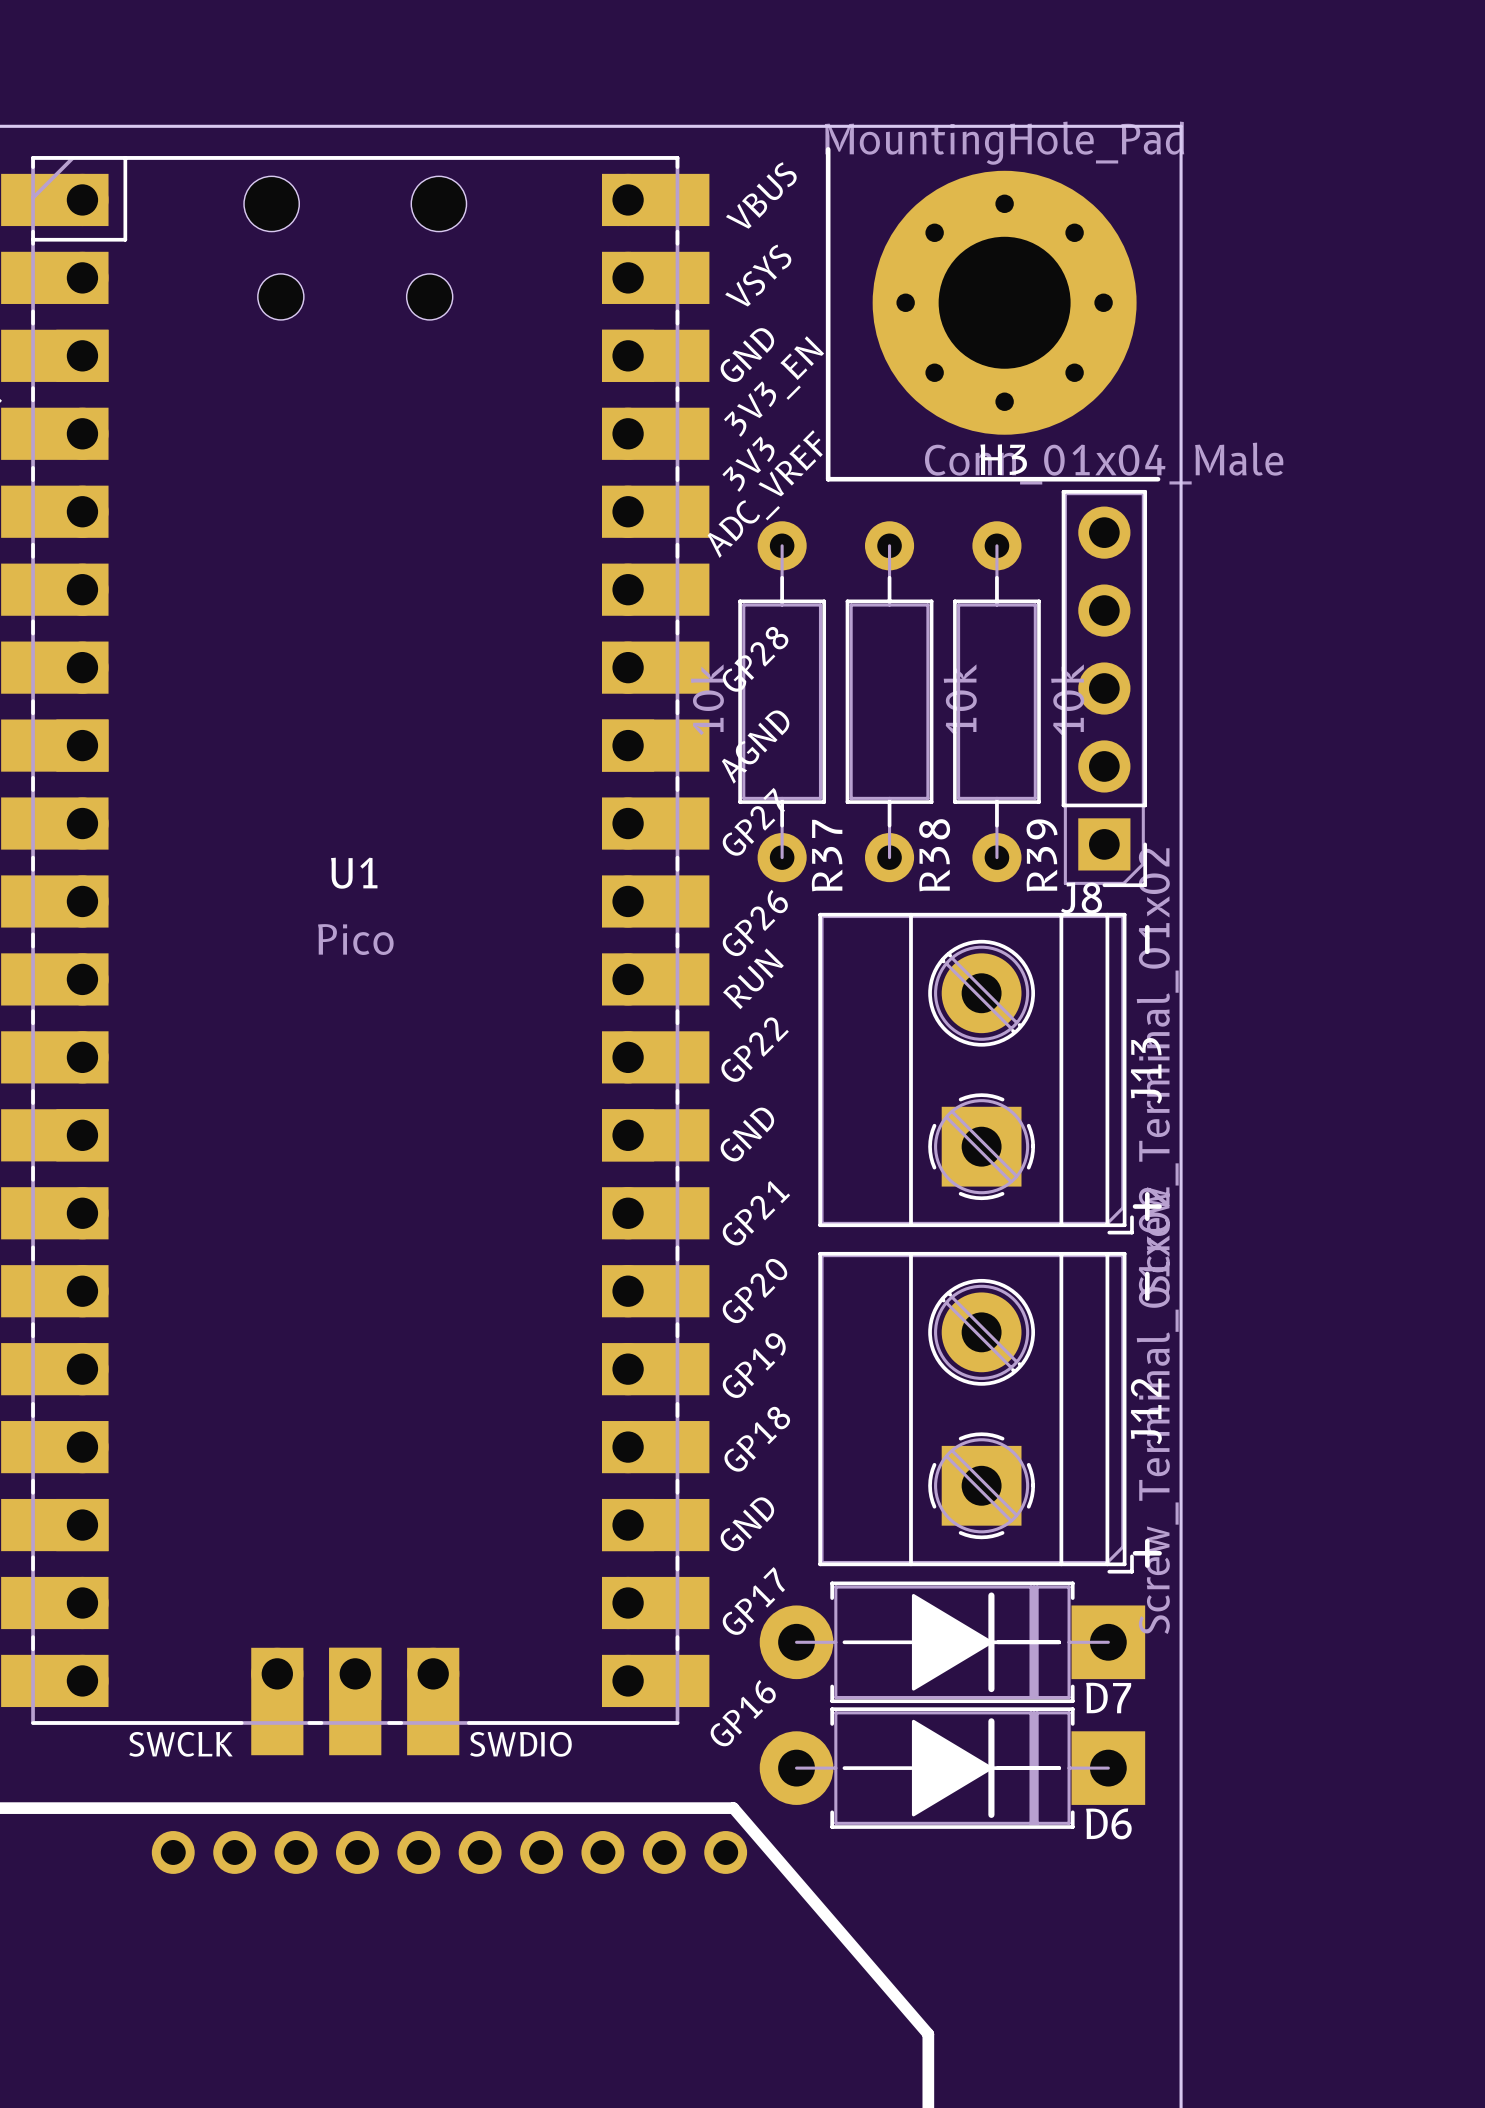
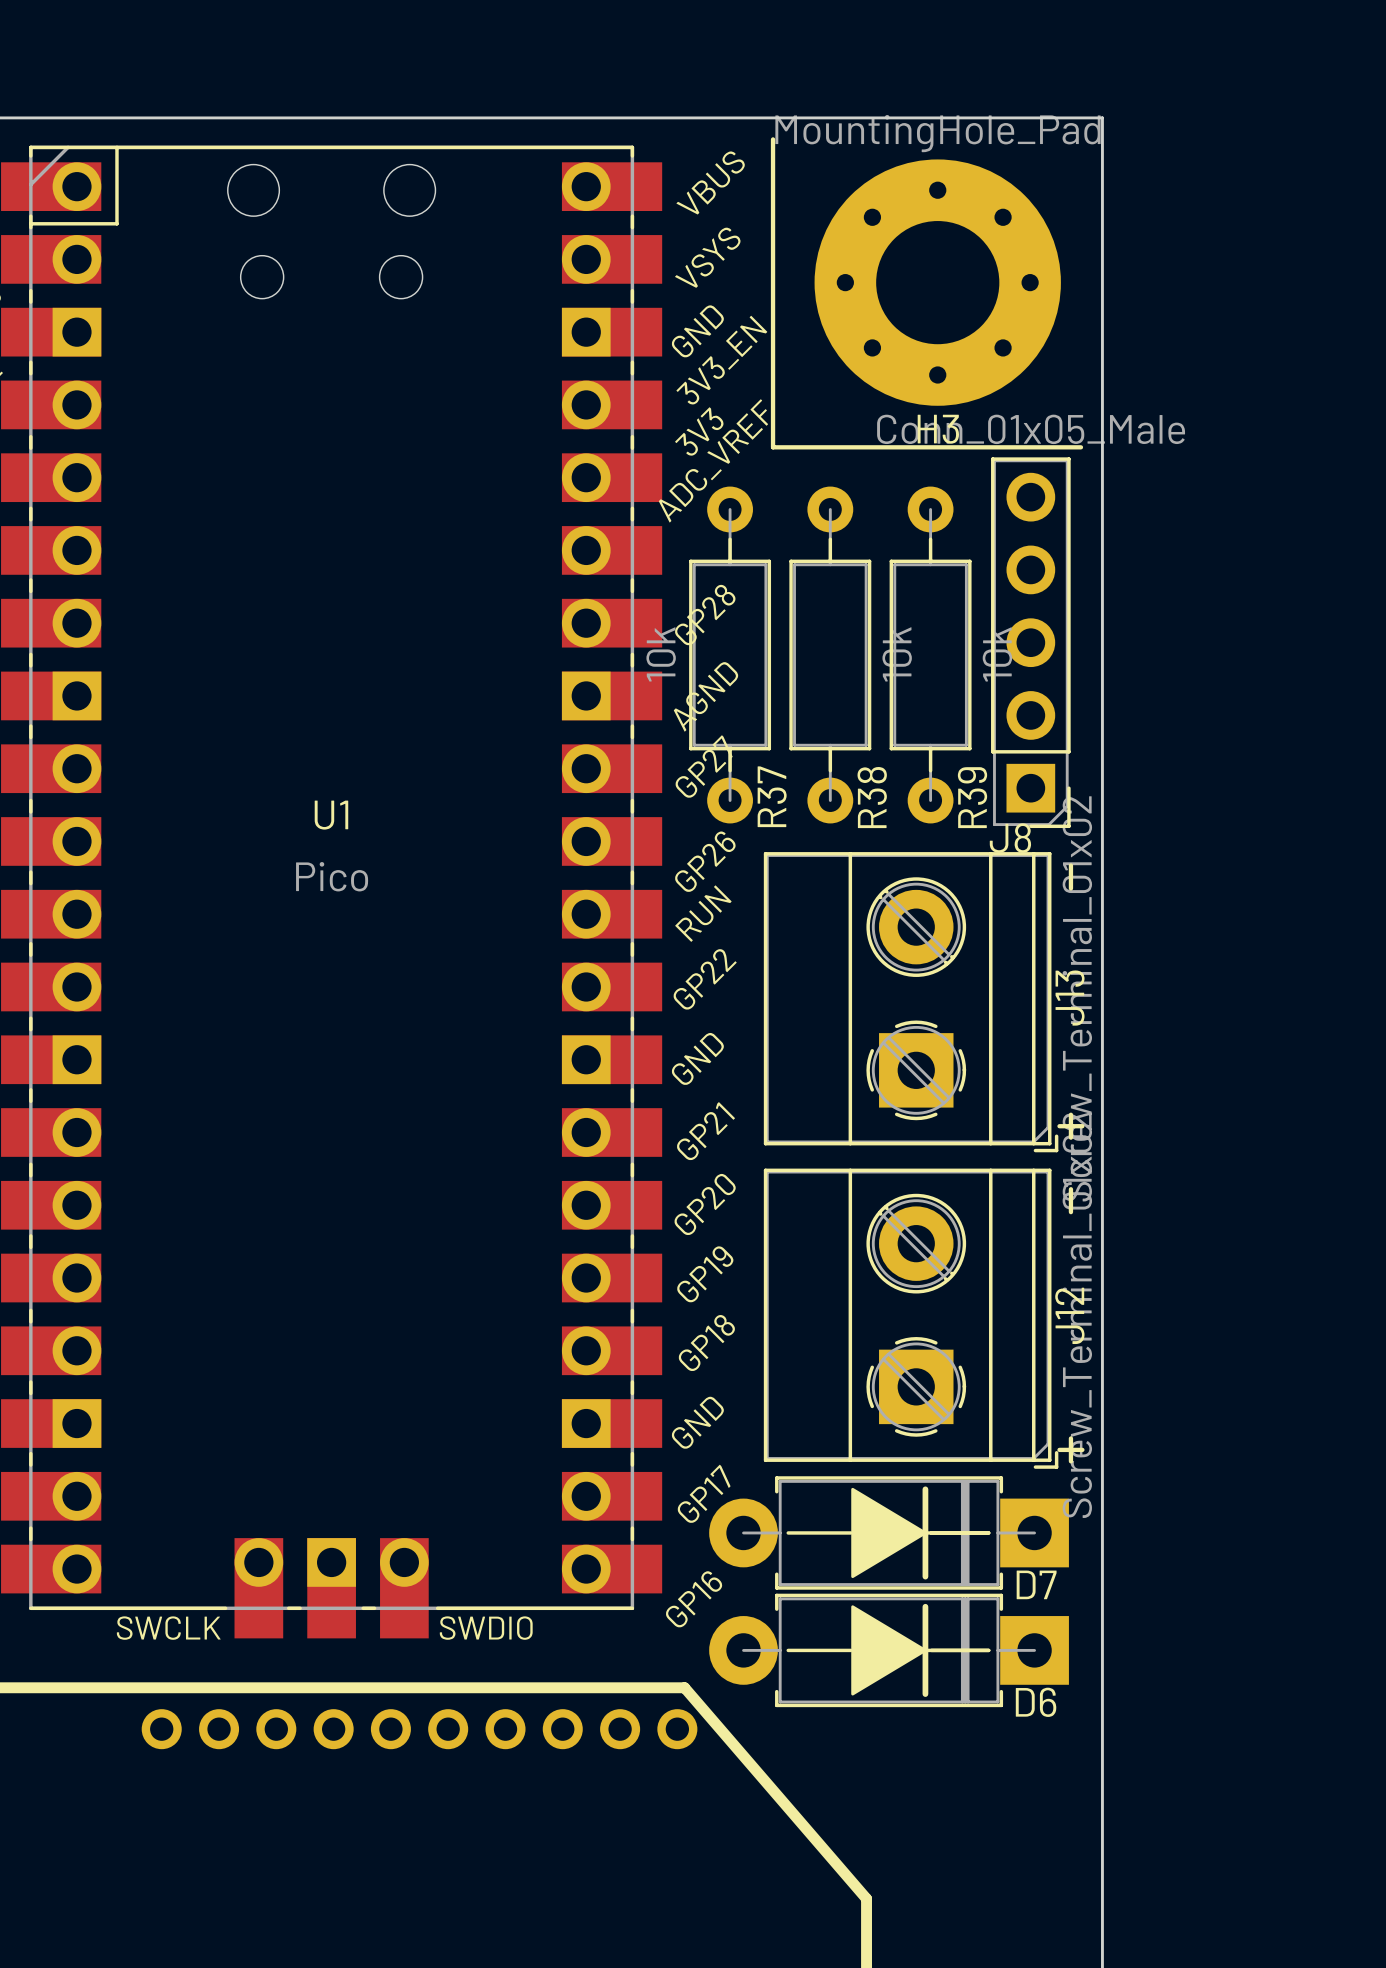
J8 value: Conn_01x04_Male (1104, 463) -> Conn_01x05_Male (1031, 429)

